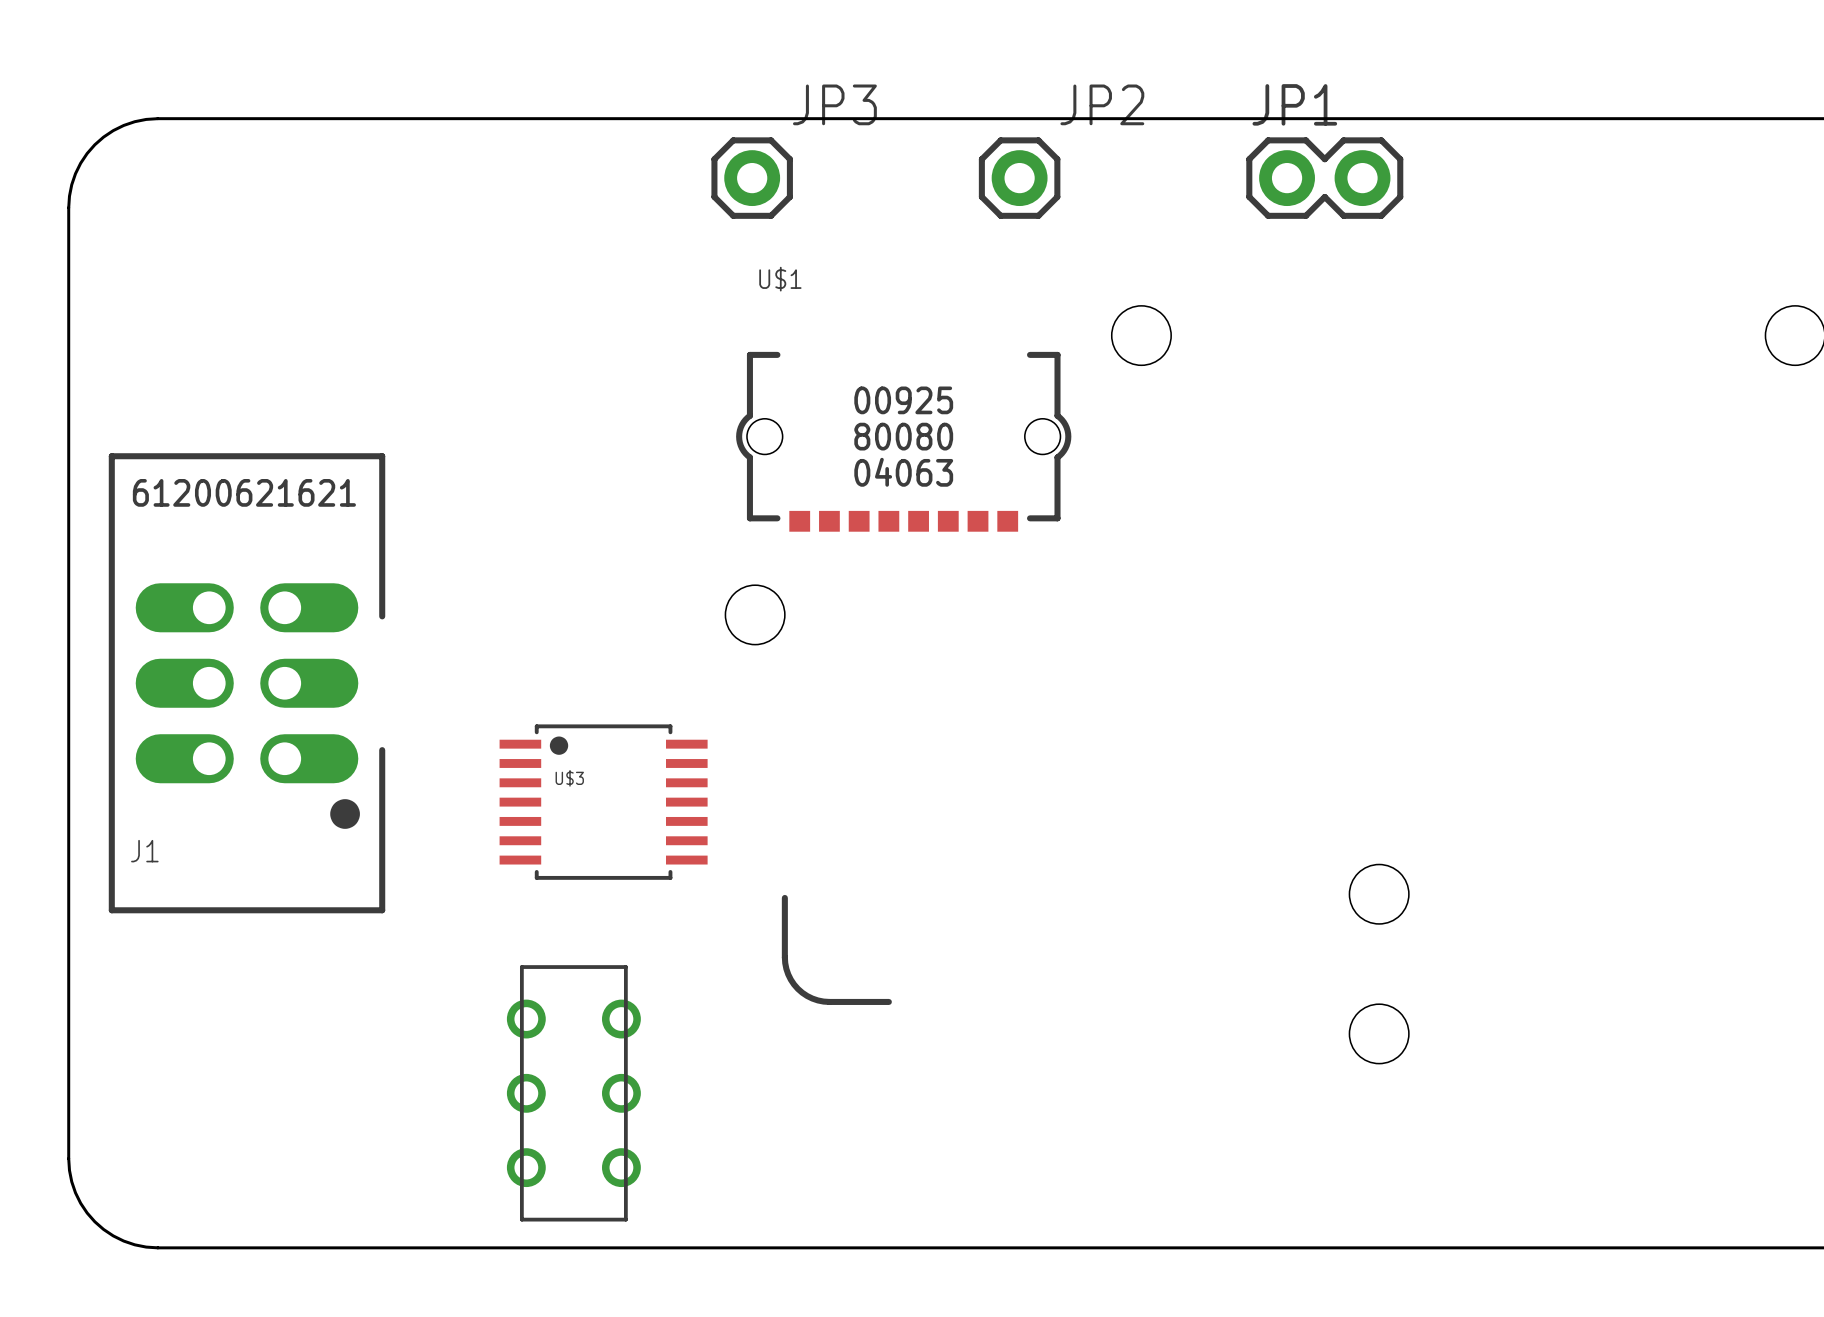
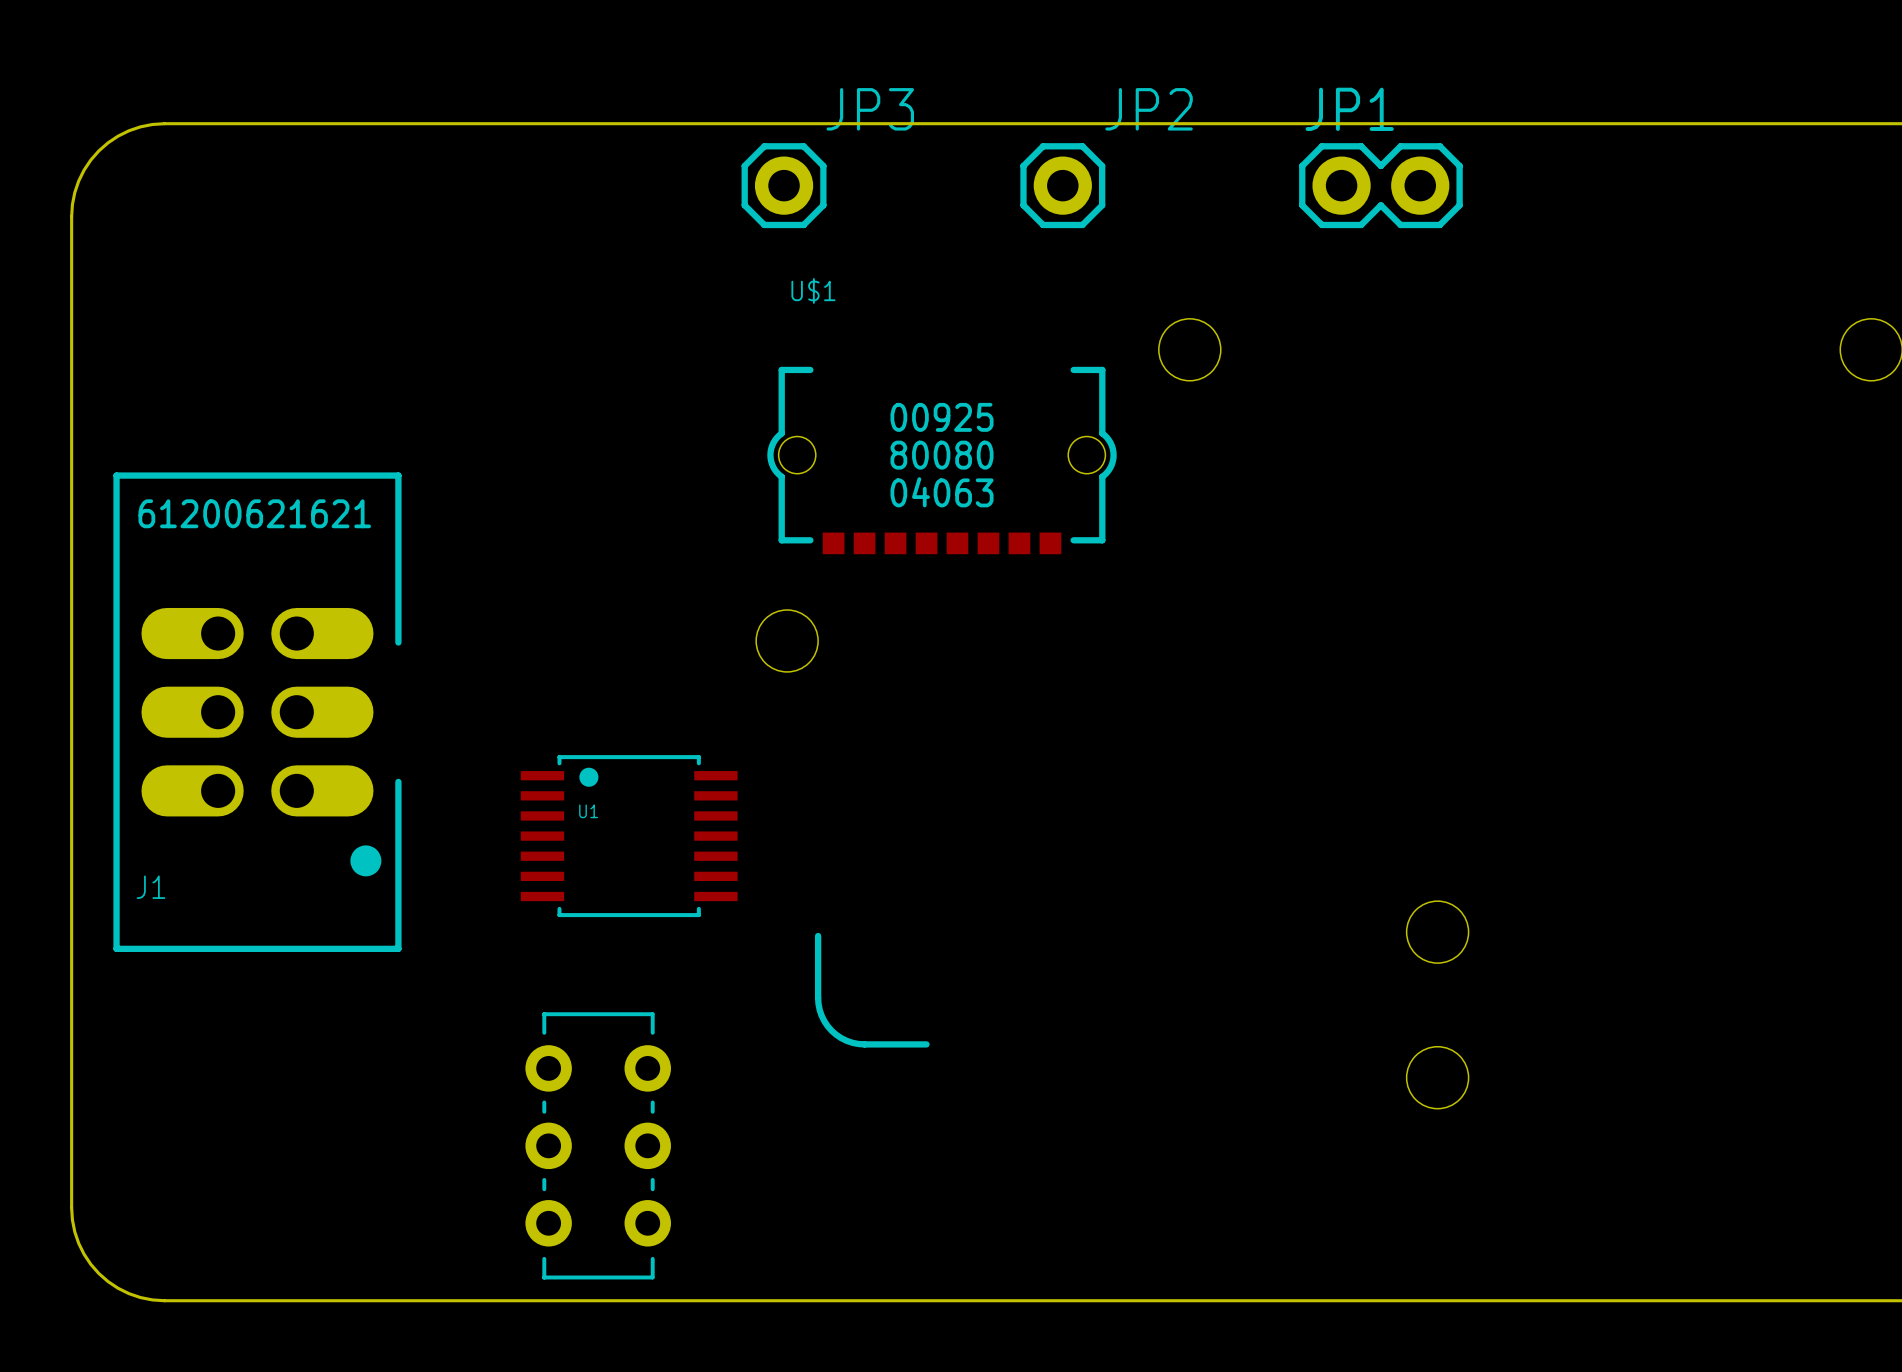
J1 footprint: [108, 453, 386, 914] -> [113, 472, 402, 953]
U$3: (603, 802) -> none
U1: none -> (629, 836)
part footprint: [506, 965, 641, 1222] -> [525, 1012, 671, 1280]

